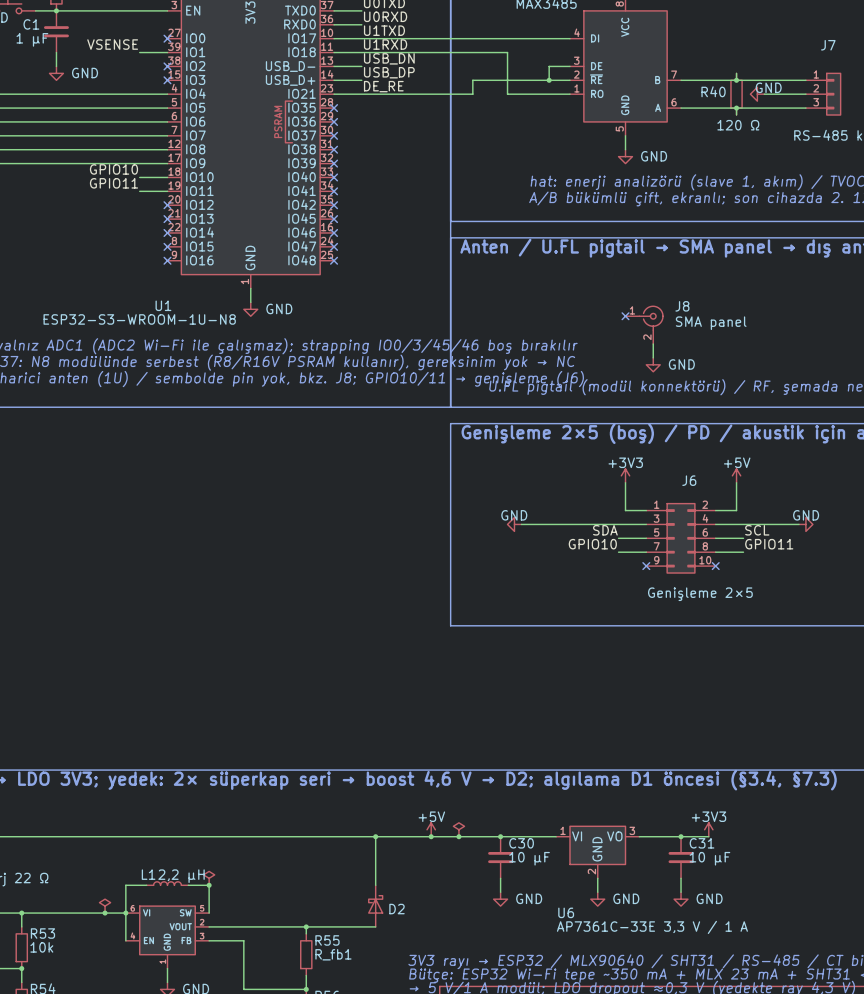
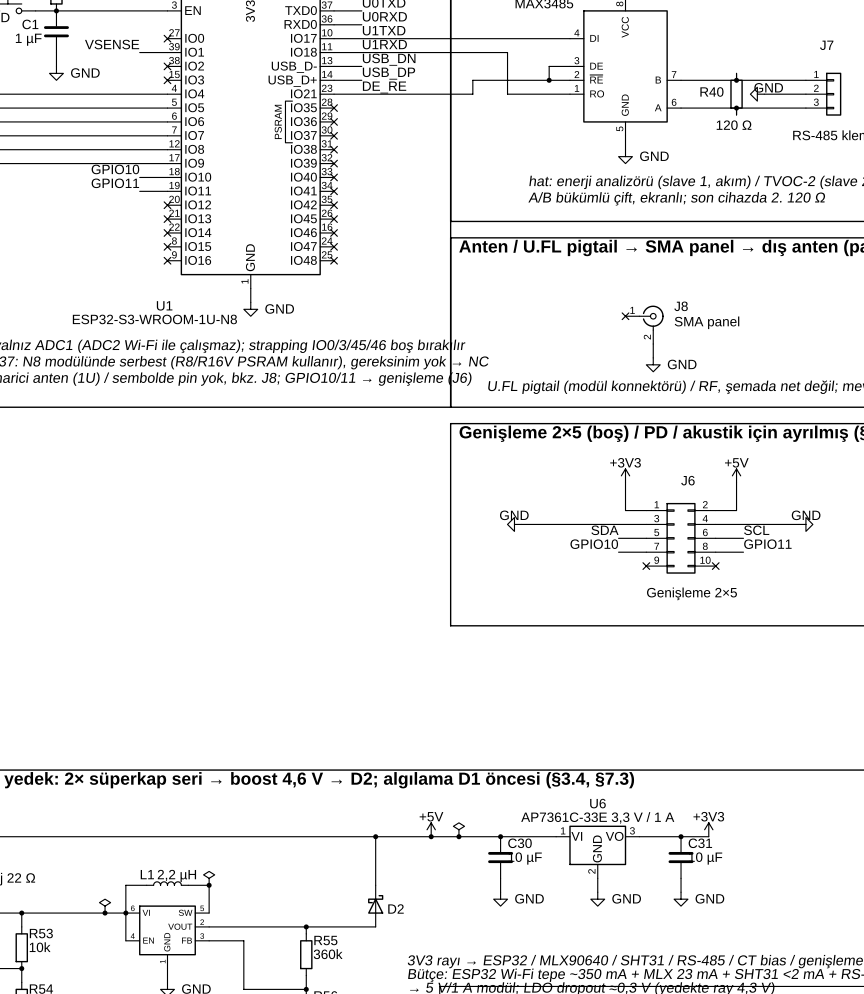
U6 name position: U6 (566, 912) -> U6 (597, 803)
U6 value position: AP7361C-33E 3,3 V / 1 A (652, 927) -> AP7361C-33E 3,3 V / 1 A (597, 817)
R55 value: R_fb1 (333, 954) -> 360k (328, 954)

